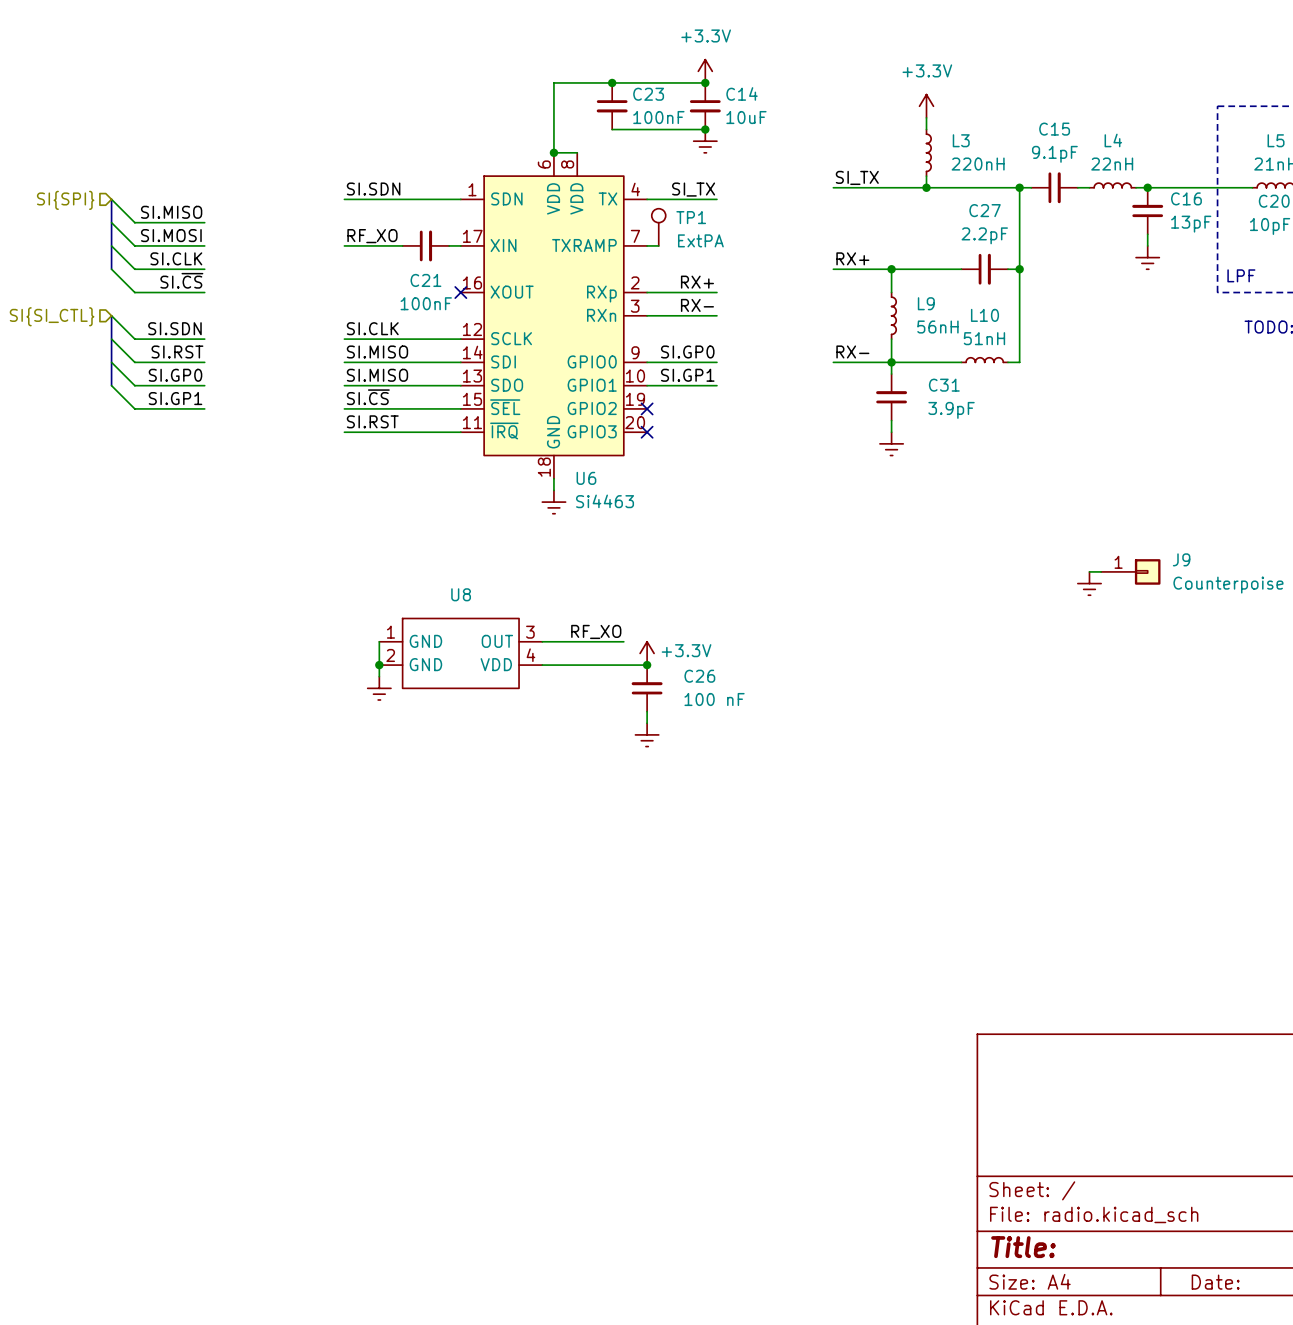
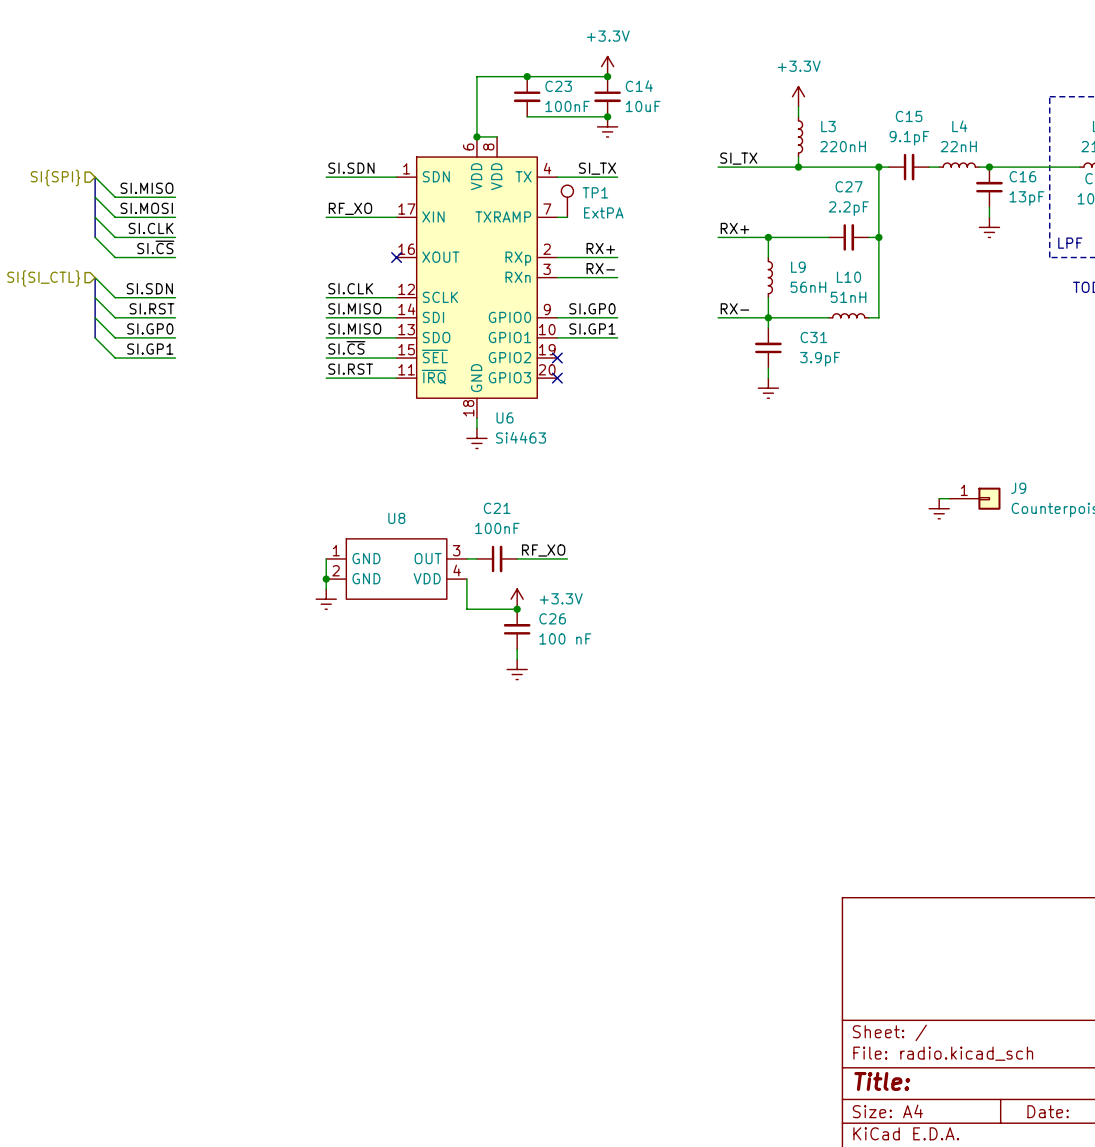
label position: SI.SDN (373, 189) -> SI.SDN (351, 168)
wire: (344, 199) (379, 199) -> none
label position: RF_XO (372, 236) -> RF_XO (350, 208)
wire: (344, 245) (379, 245) -> none
C21 position: (425, 245) -> (497, 558)
C21 name position: C21 (425, 280) -> C21 (497, 508)
C21 value position: 100nF (426, 303) -> 100nF (497, 528)
label position: SI.CLK (372, 328) -> SI.CLK (350, 288)
wire: (344, 339) (379, 339) -> none
label: SI.MISO (377, 351) -> none
label: none -> SI.MISO (354, 308)
wire: (344, 362) (379, 362) -> none
label: SI.MISO (377, 375) -> none
label: none -> SI.MISO (354, 328)
wire: (344, 385) (379, 385) -> none
label position: SI.~{CS} (368, 397) -> SI.~{CS} (346, 347)
wire: (344, 408) (379, 408) -> none
label position: SI.RST (372, 421) -> SI.RST (350, 369)
wire: (344, 432) (379, 432) -> none
label position: RF_XO (596, 631) -> RF_XO (543, 550)
wire: none -> (537, 558) (567, 558)
power symbol text position: +3.3V (686, 650) -> +3.3V (561, 598)
power symbol position: +3.3V (647, 653) -> +3.3V (517, 599)
wire: (542, 665) (647, 665) -> (466, 579) (466, 609) (517, 609)
junction: (647, 665) -> none
C26 name position: C26 (699, 676) -> C26 (552, 618)
C26 position: (647, 688) -> (517, 629)
junction: none -> (517, 609)
C26 value position: 100 nF (714, 699) -> 100 nF (565, 638)
wire: (647, 711) (647, 723) -> (517, 649) (517, 659)
power symbol position: (647, 734) -> (517, 669)

